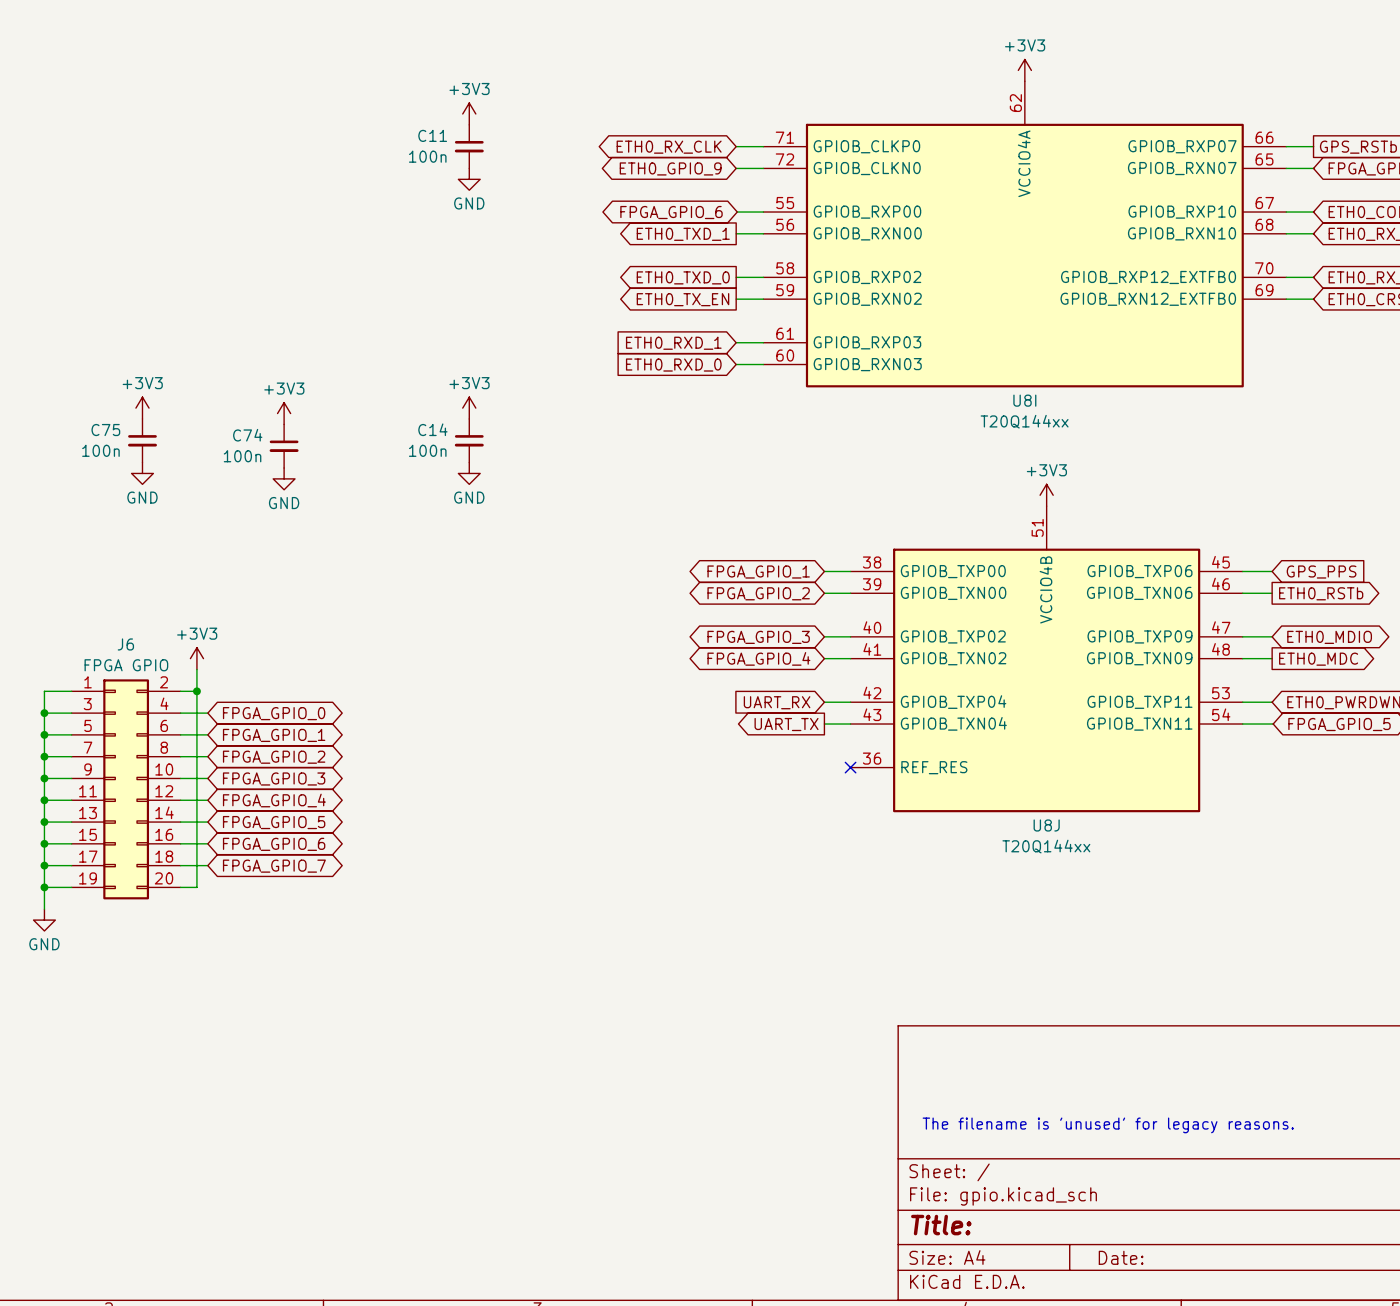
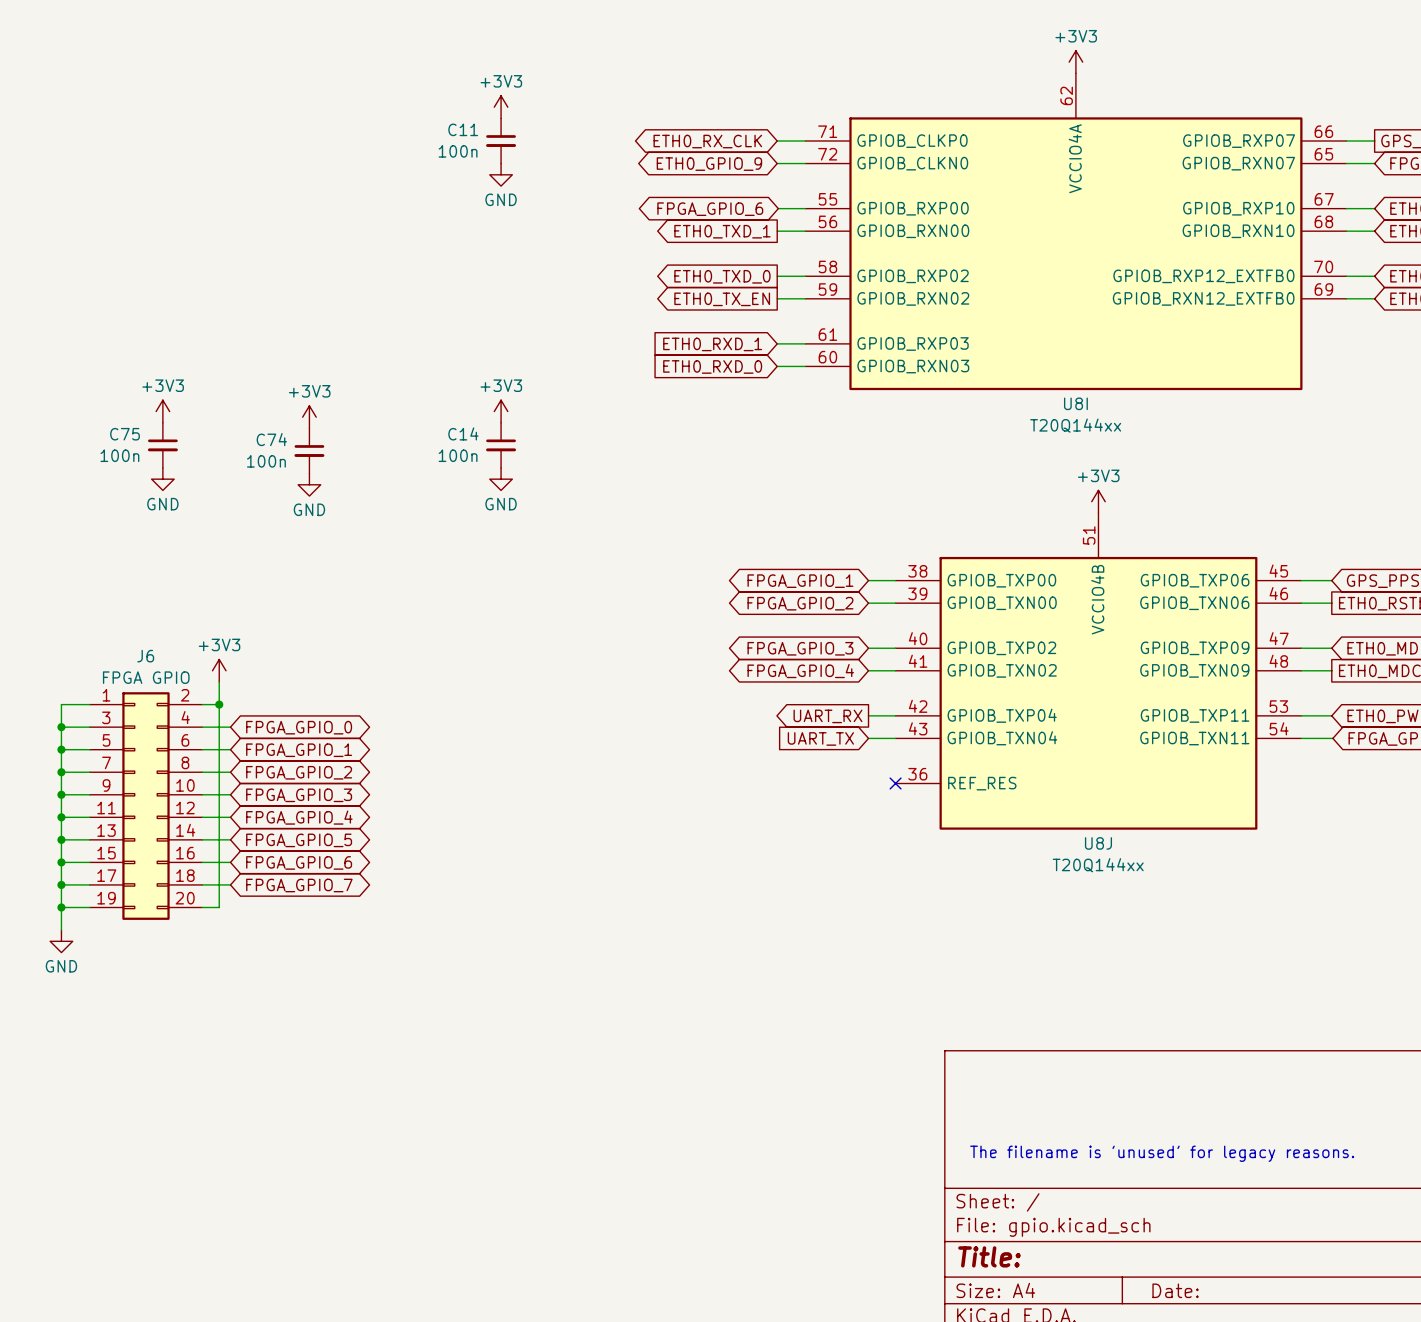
global label shape: input (777, 702) -> output (827, 716)
global label shape: output (786, 724) -> input (820, 738)

